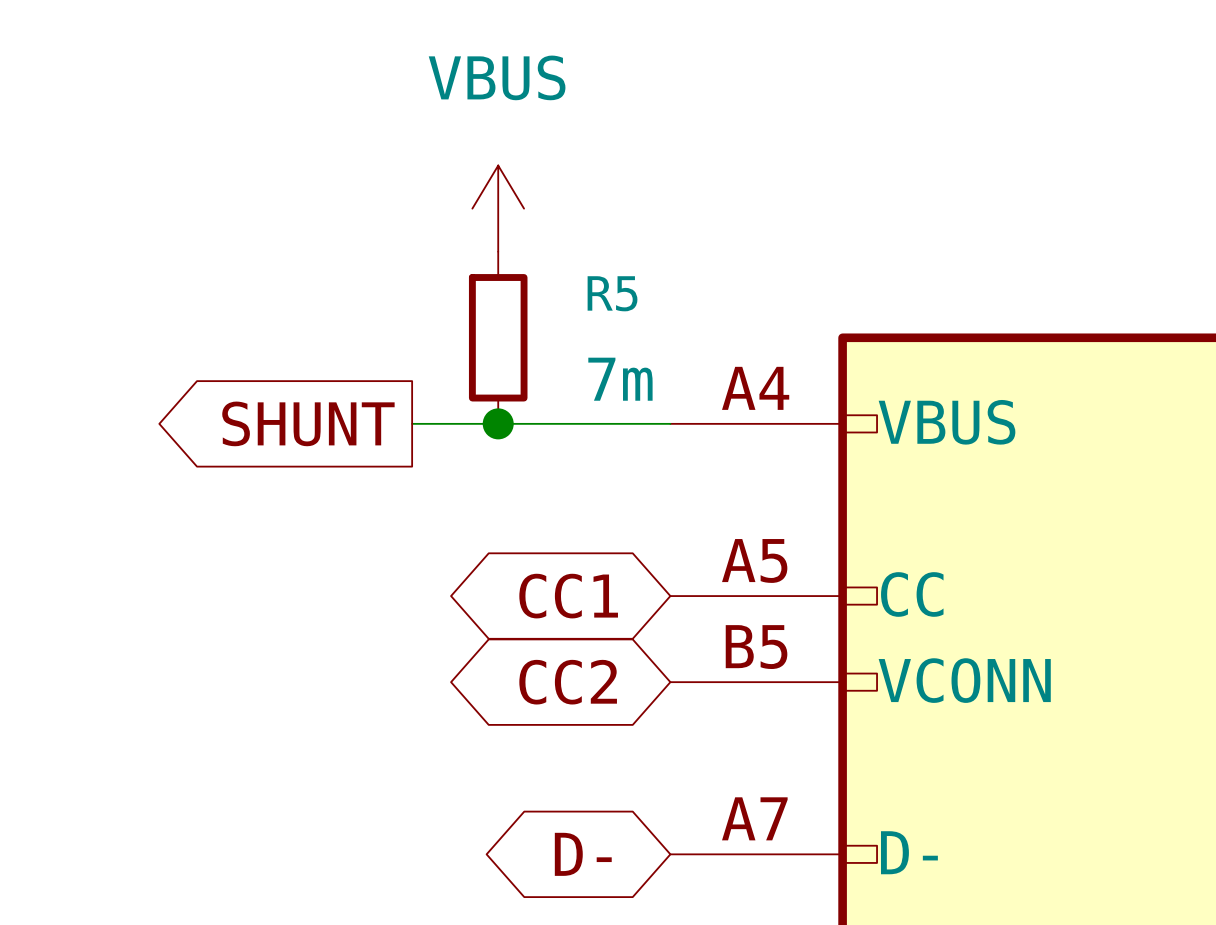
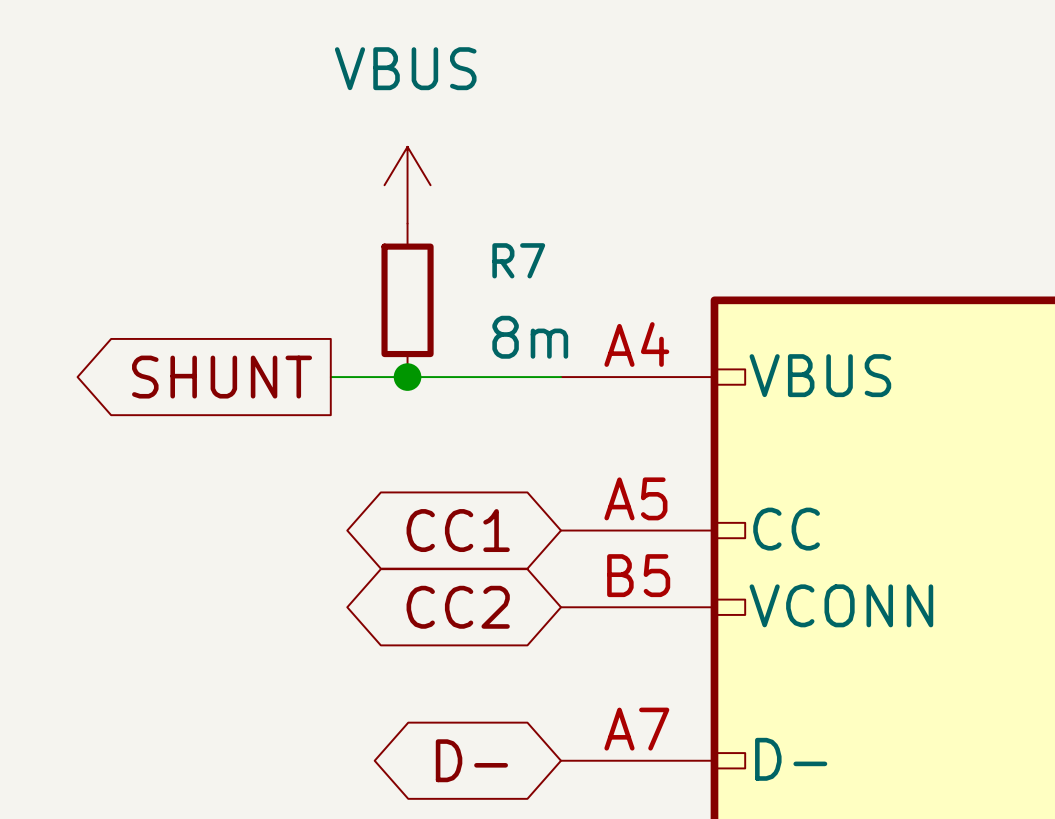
R5 name: R5 (612, 293) -> R7 (518, 260)
R5 value: 7m (620, 379) -> 8m (530, 337)

